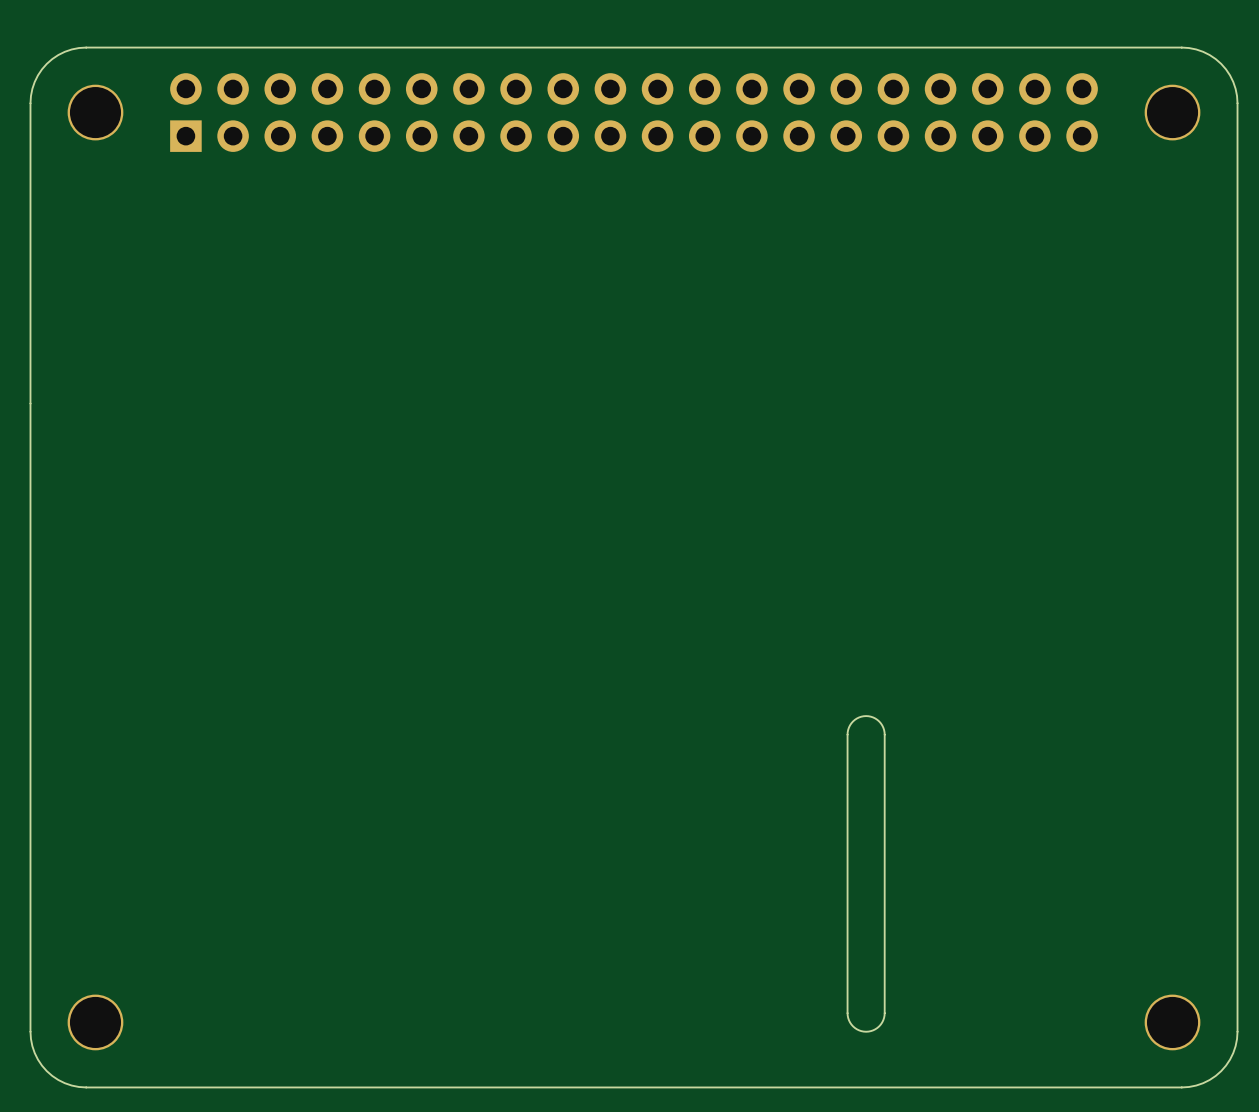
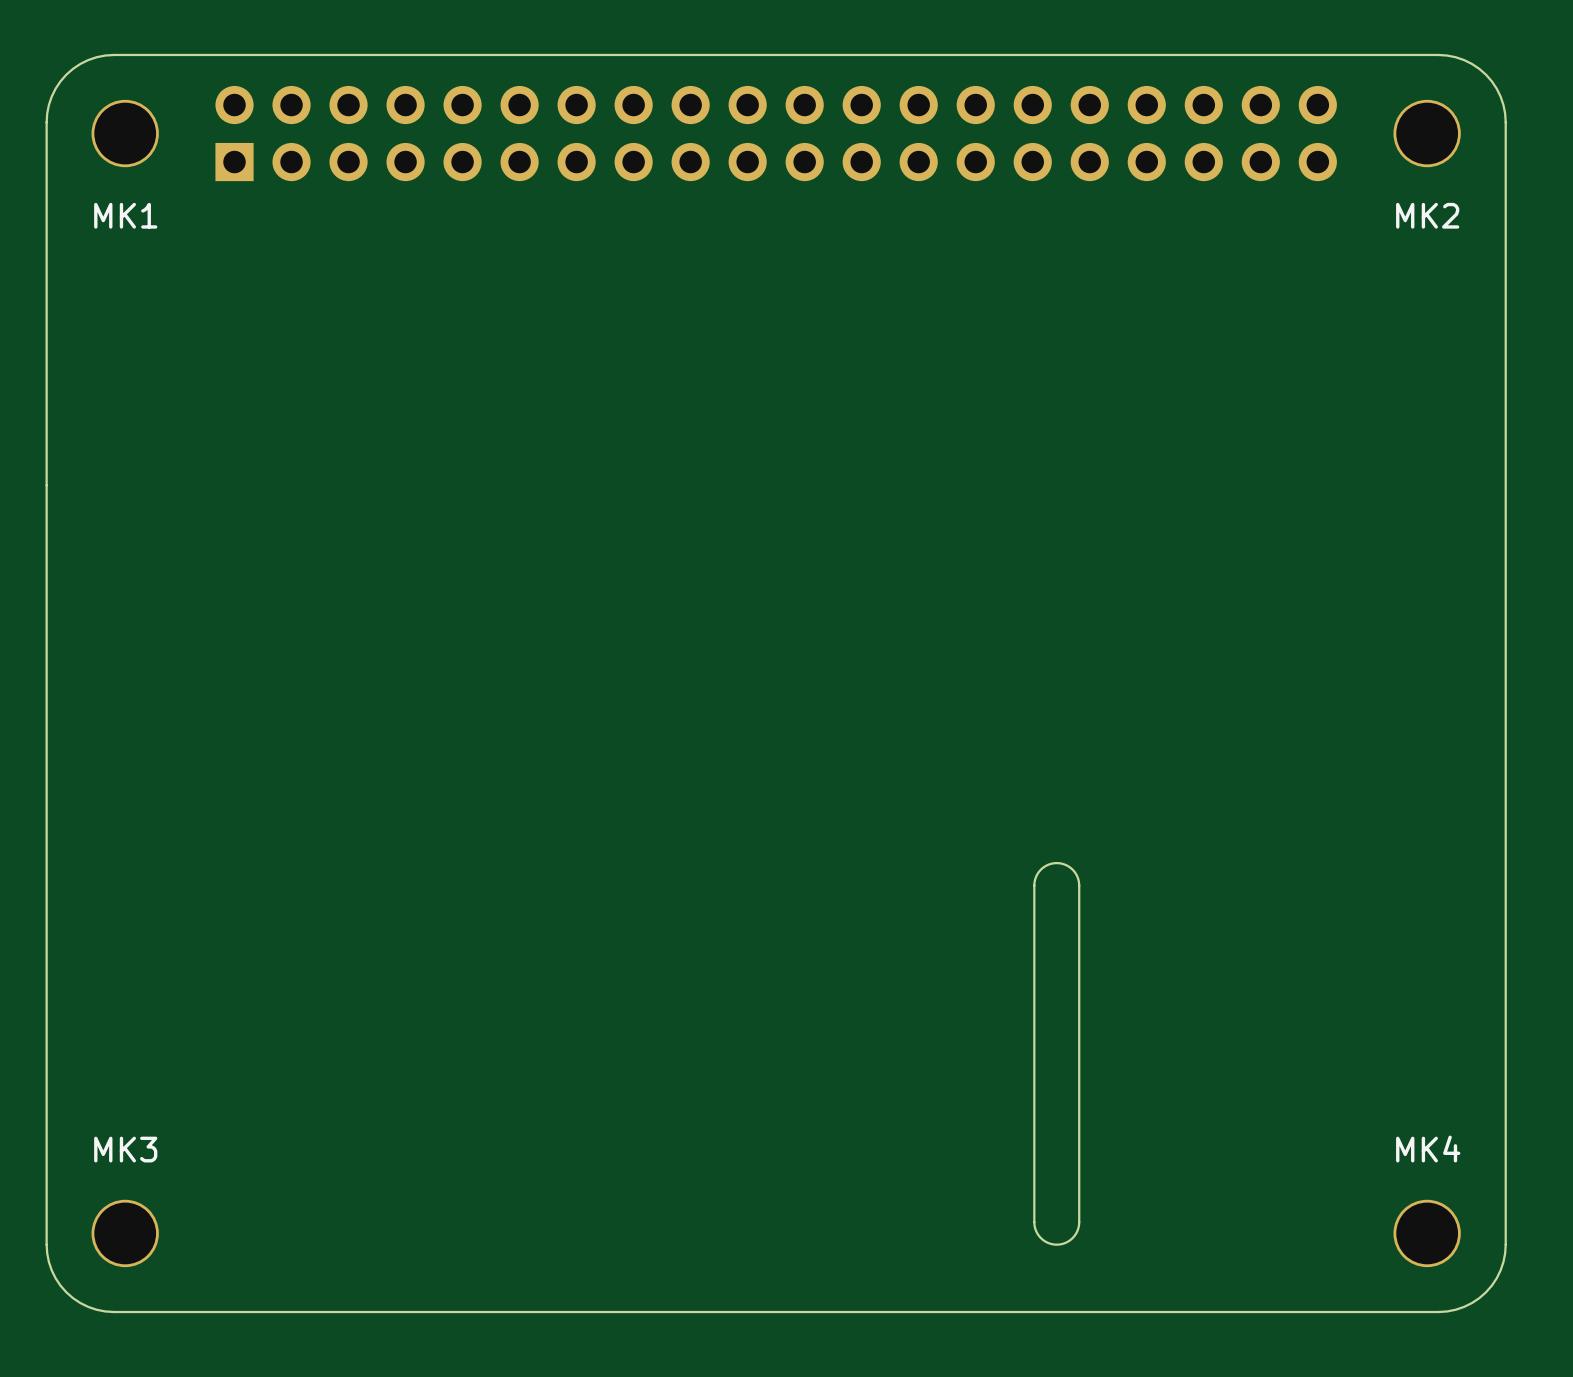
MK1 name: none -> MK1 (125, 215)
MK2 name: none -> MK2 (1427, 215)
MK4 name: none -> MK4 (1428, 1149)
MK3 name: none -> MK3 (125, 1149)

